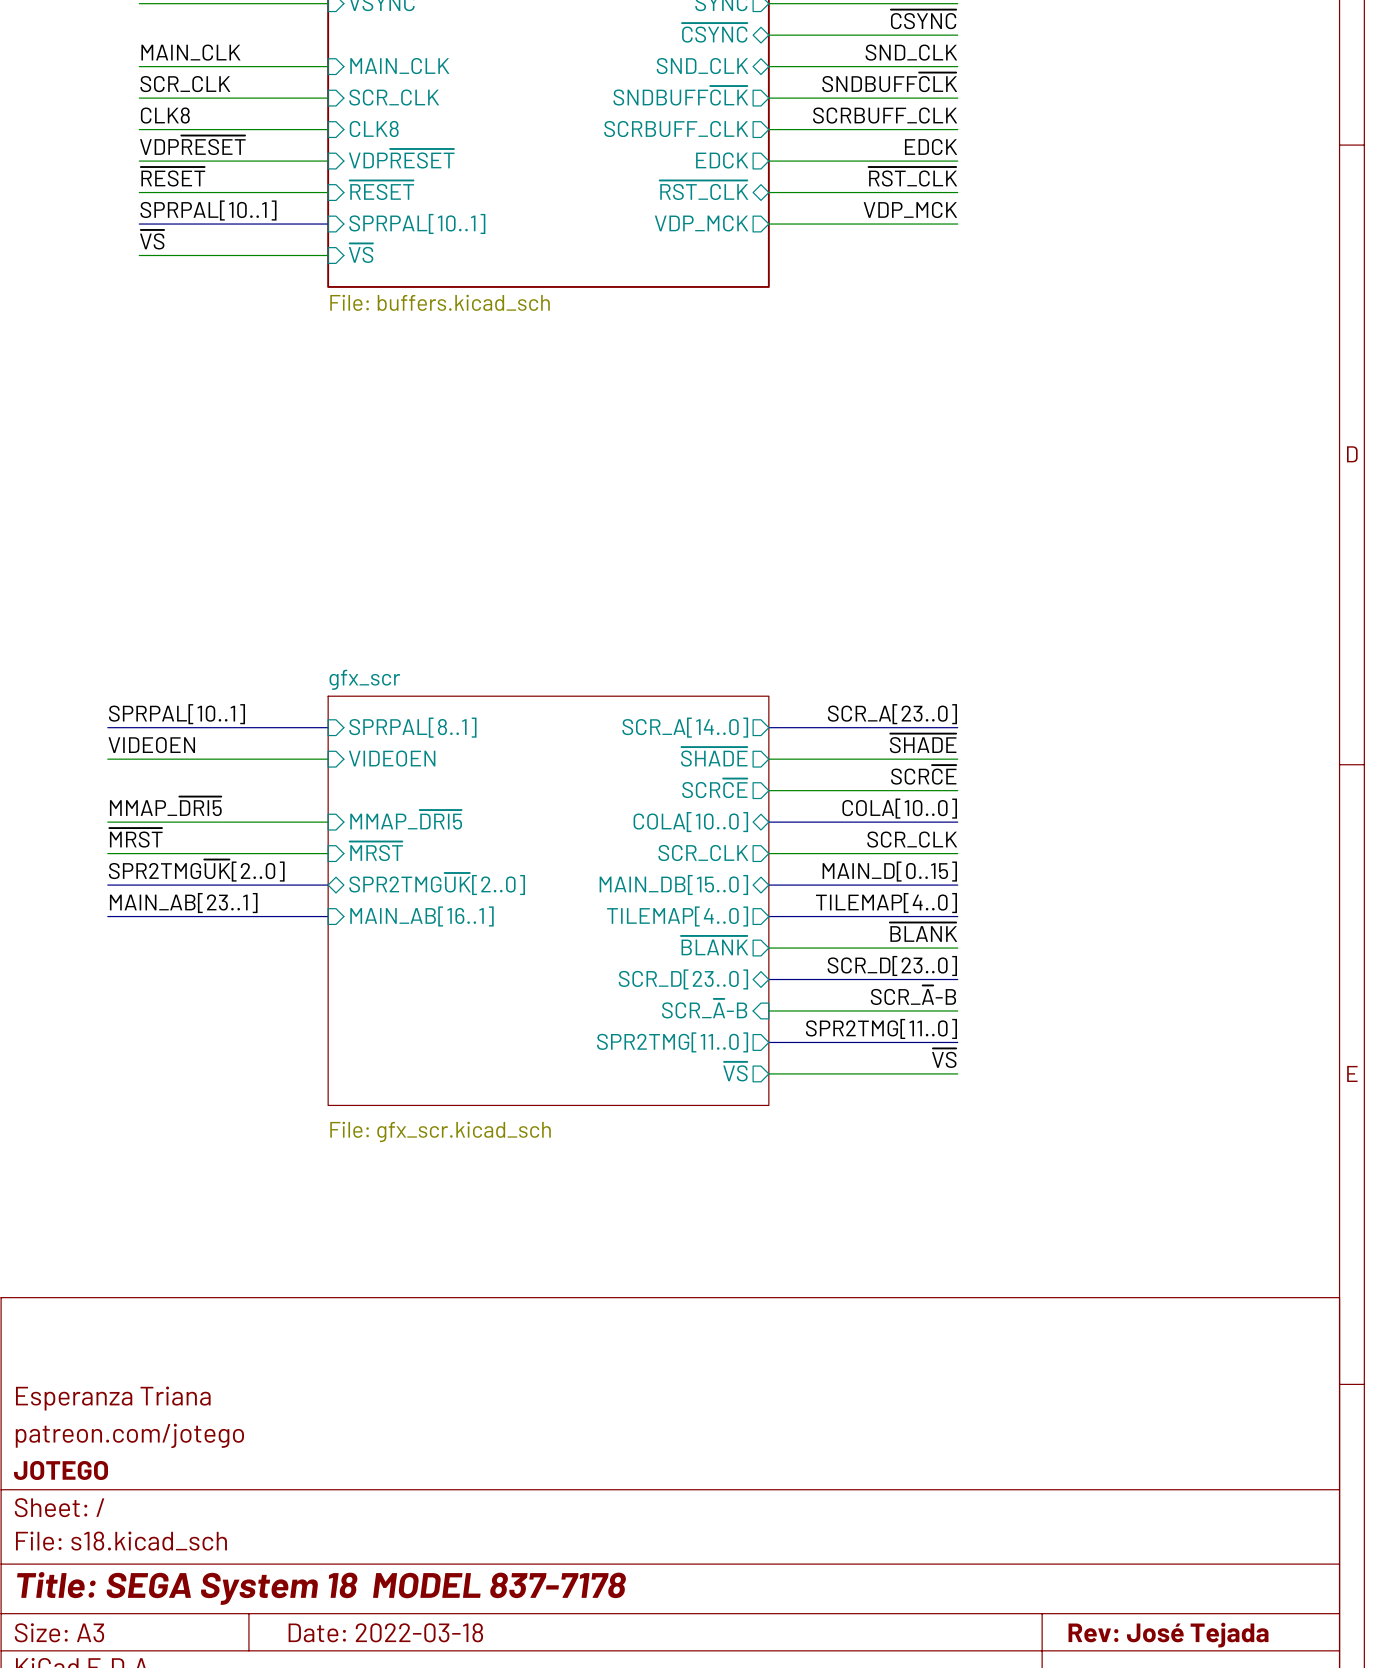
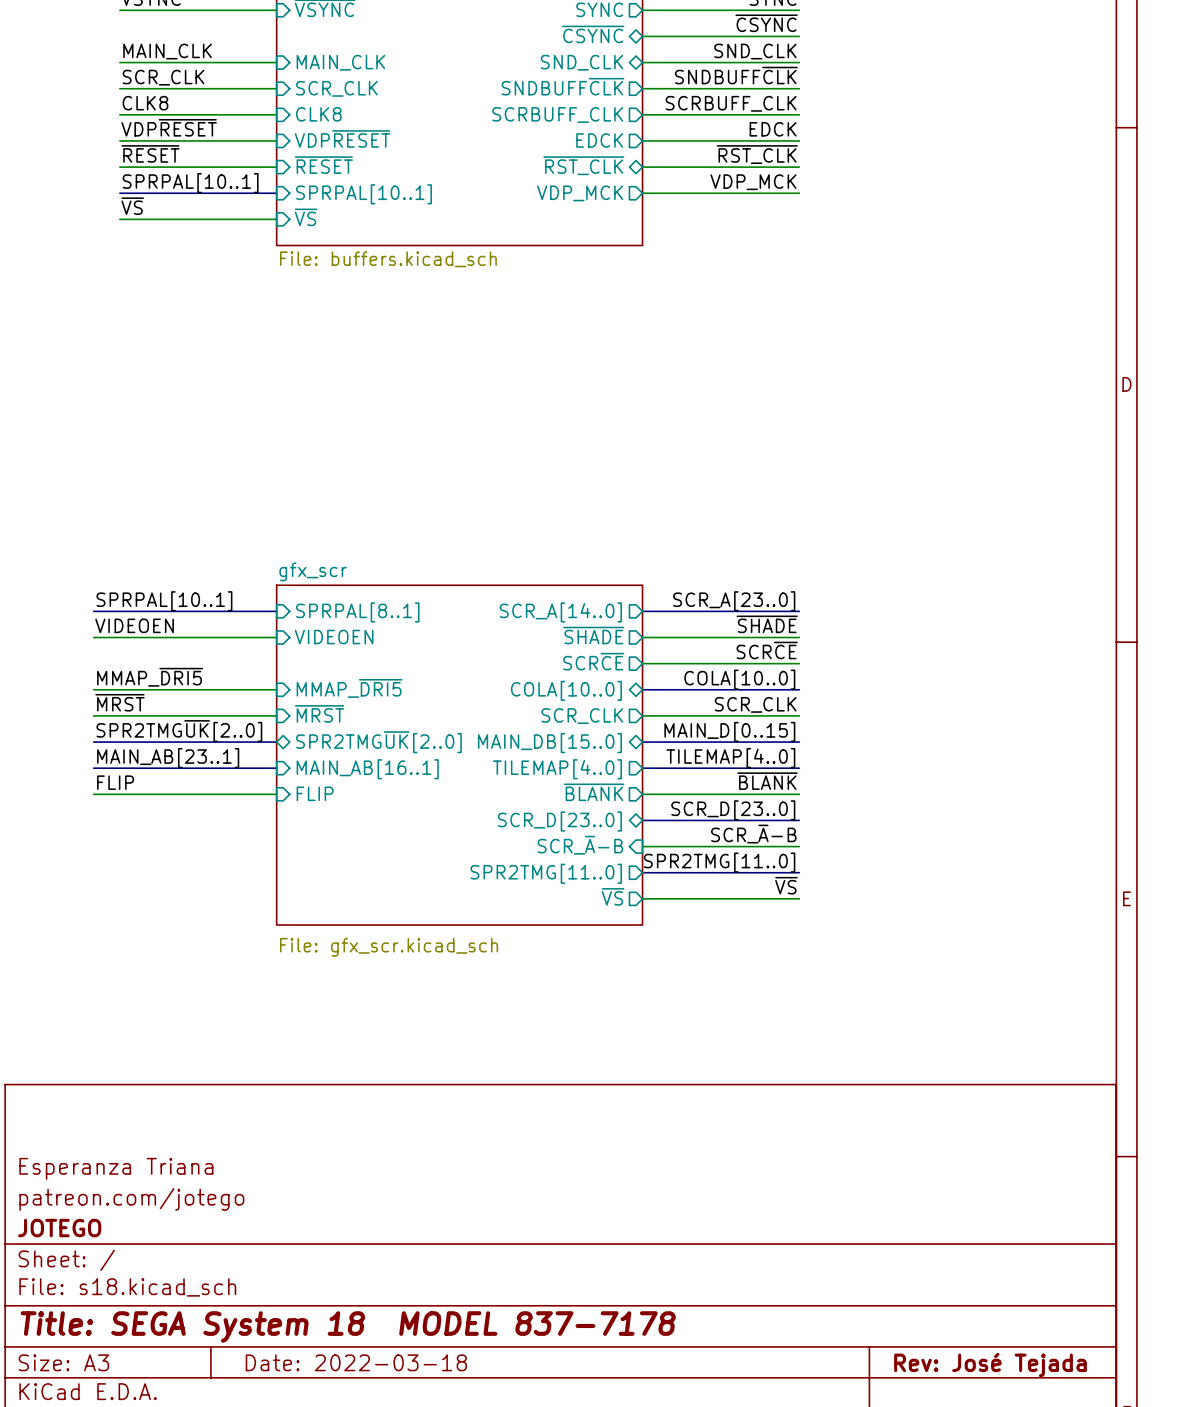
label: none -> FLIP (115, 782)
sheet pin: none -> FLIP (315, 793)
wire: none -> (93, 794) (276, 794)

